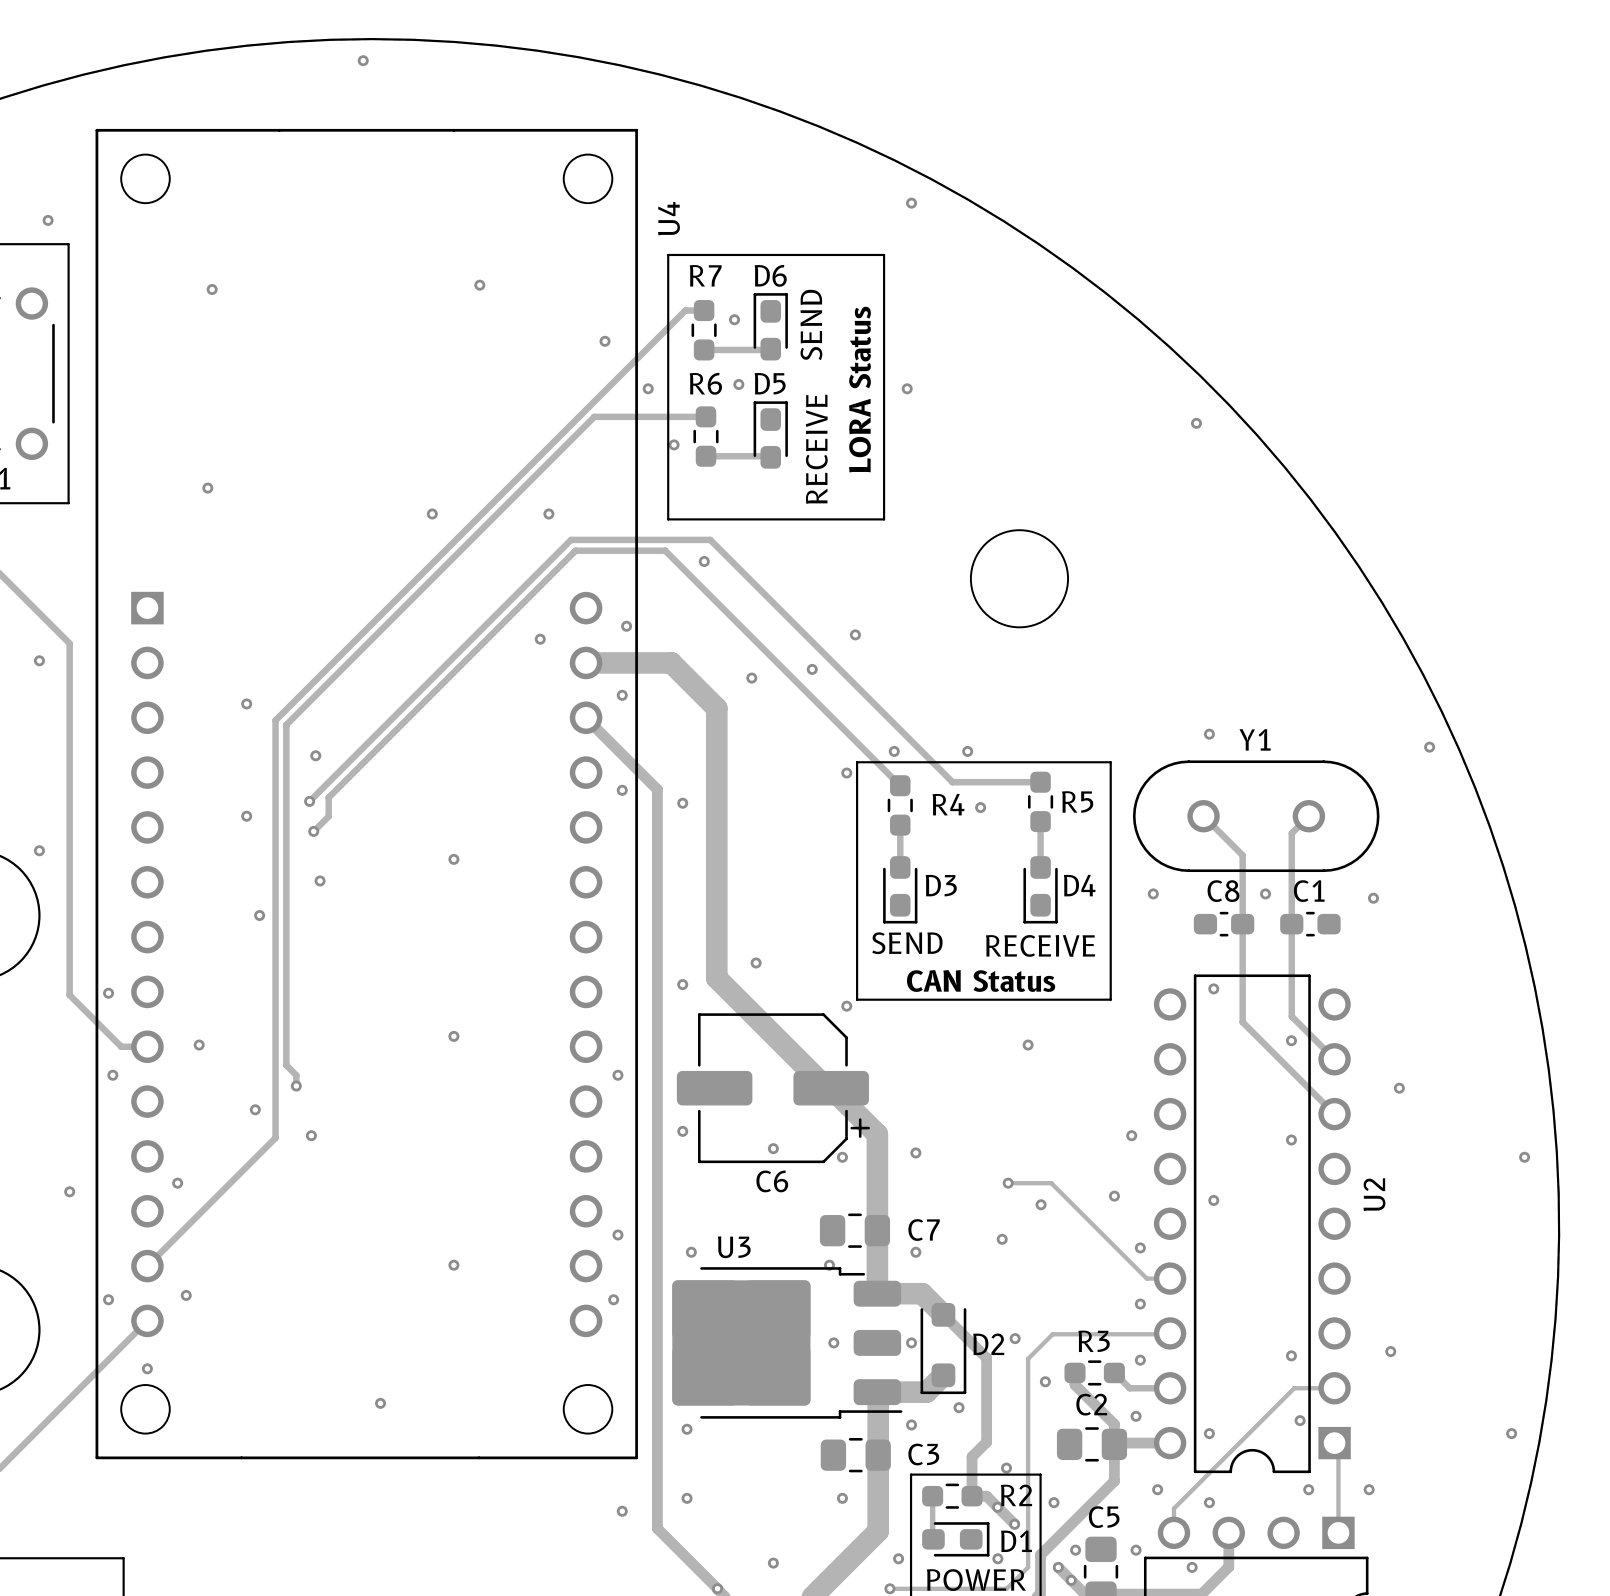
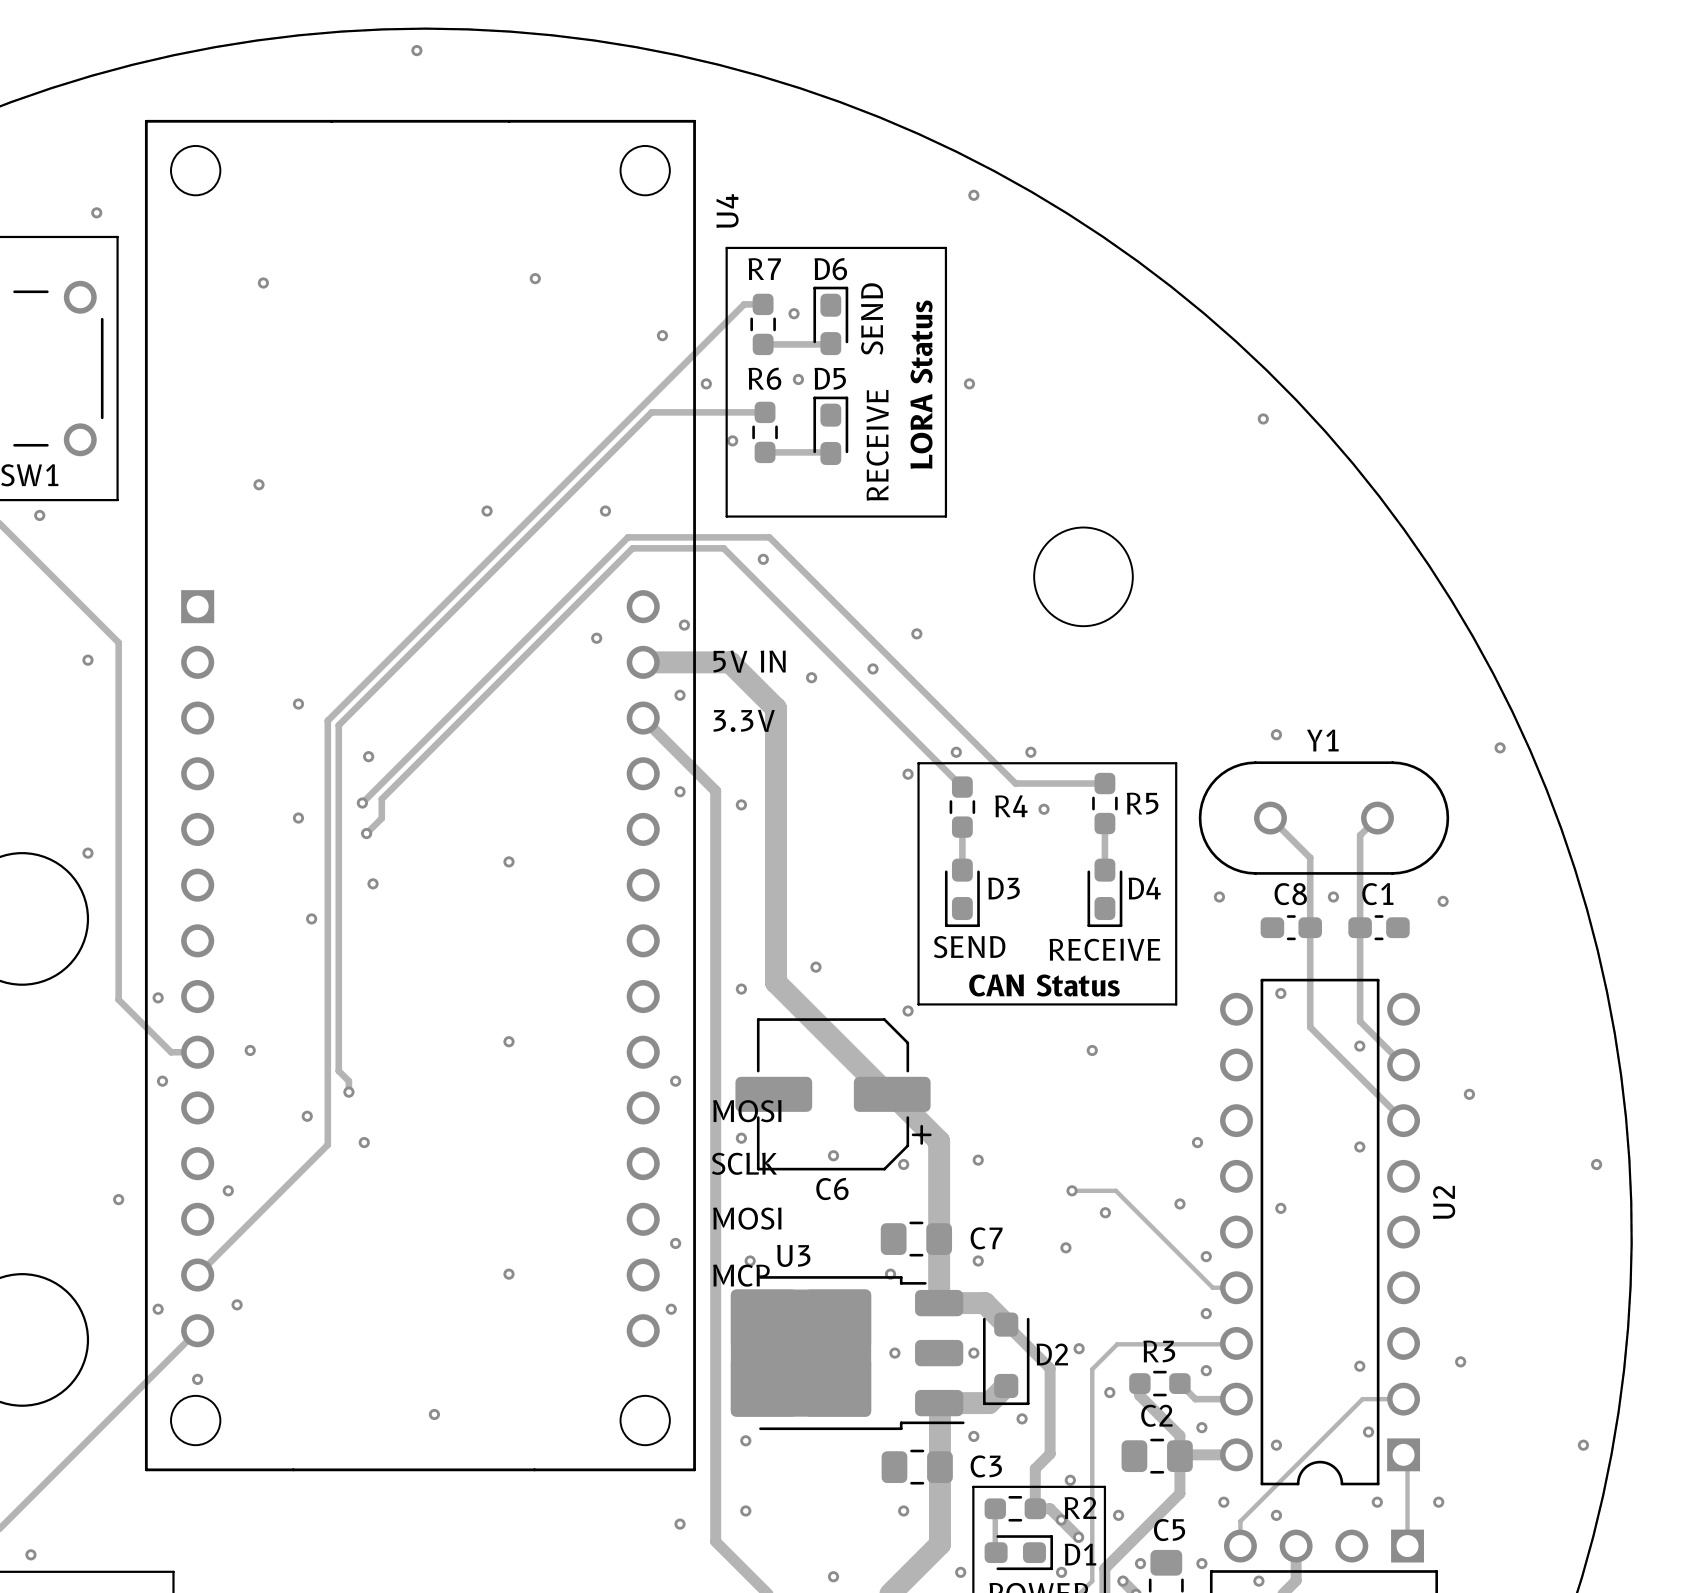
text: none -> 5V IN (749, 661)
text: none -> 3.3V (744, 720)
text: none -> MOSI (747, 1111)
text: none -> SCLK (744, 1163)
text: none -> MOSI (747, 1218)
text: none -> MCP (741, 1275)

